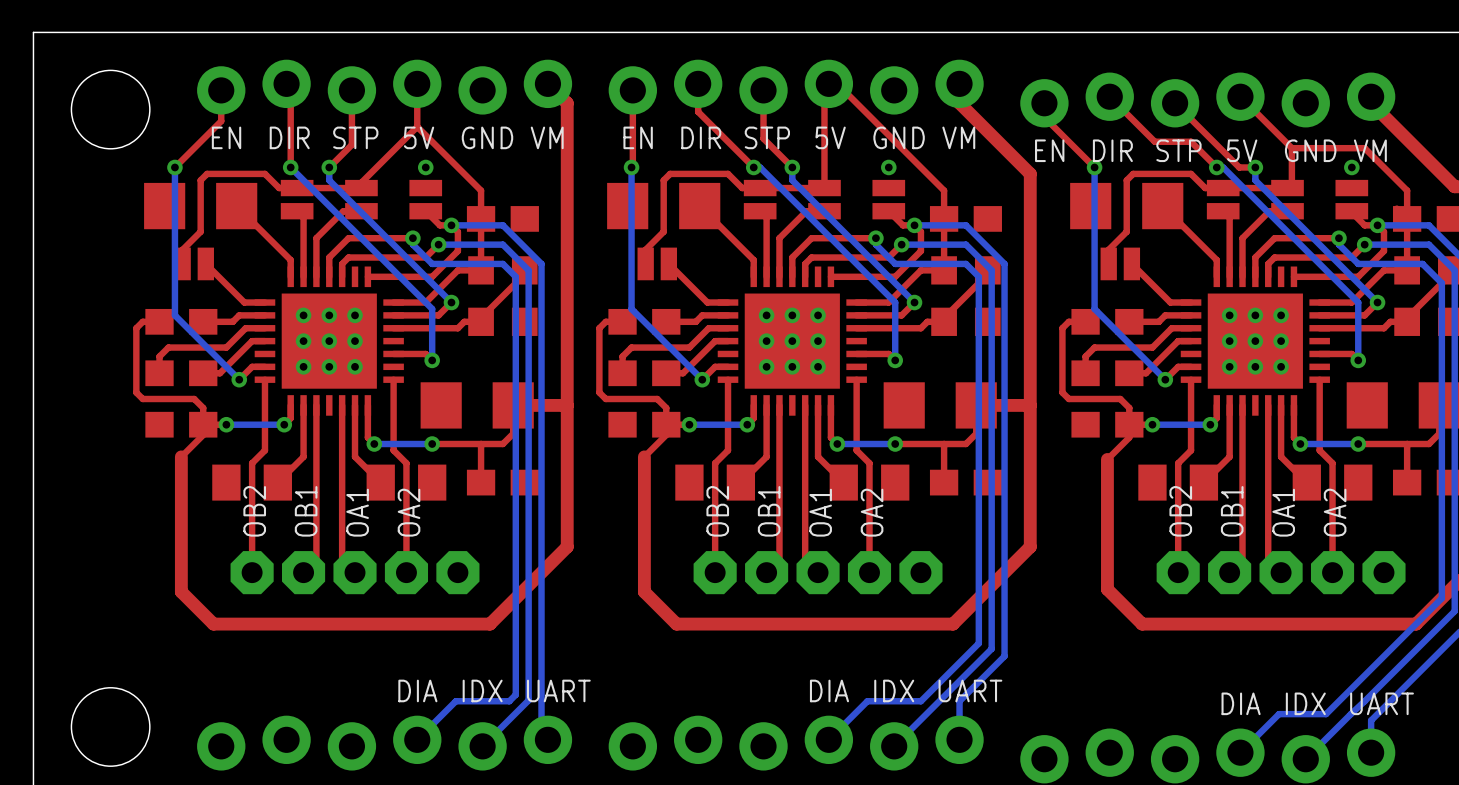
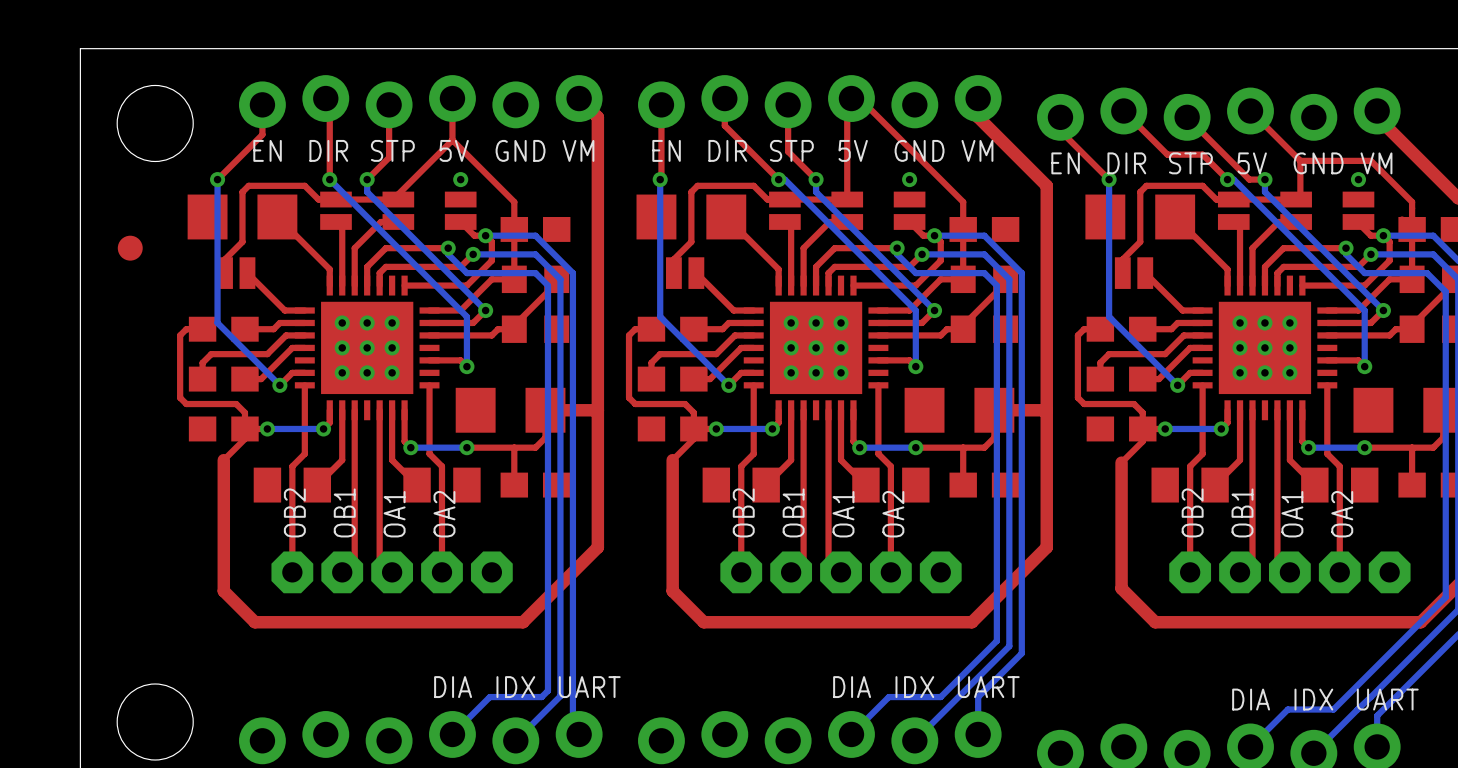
part: none -> (130, 248)

